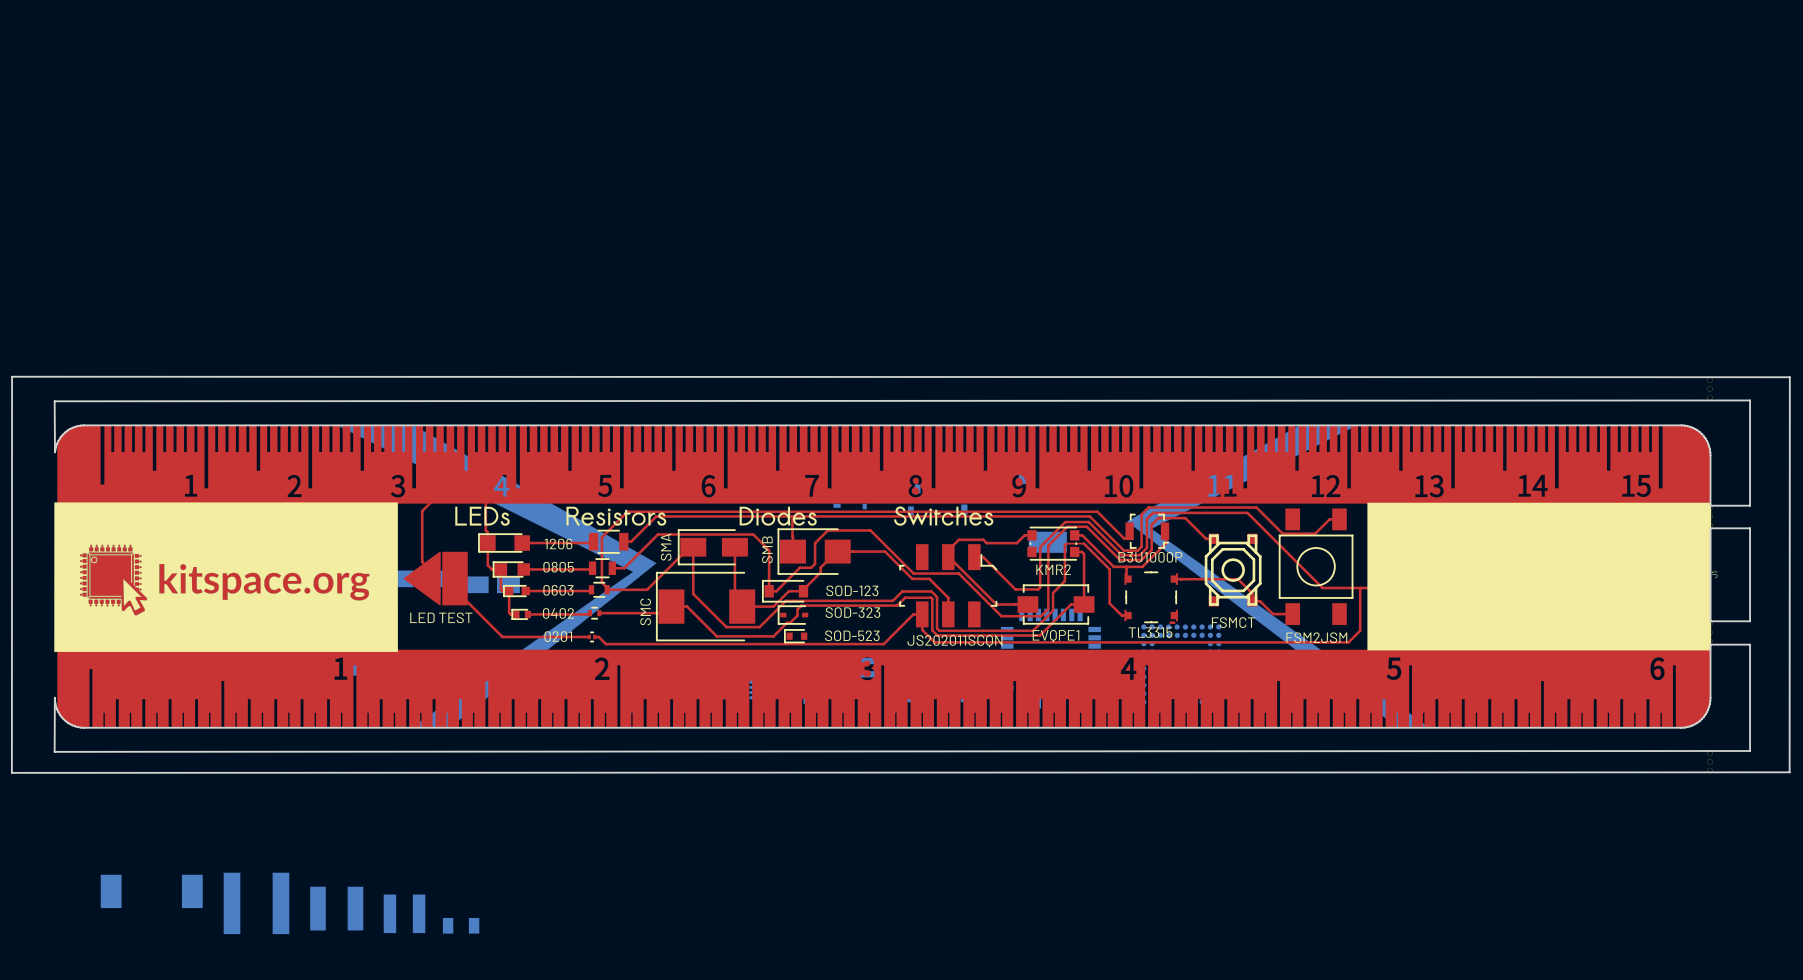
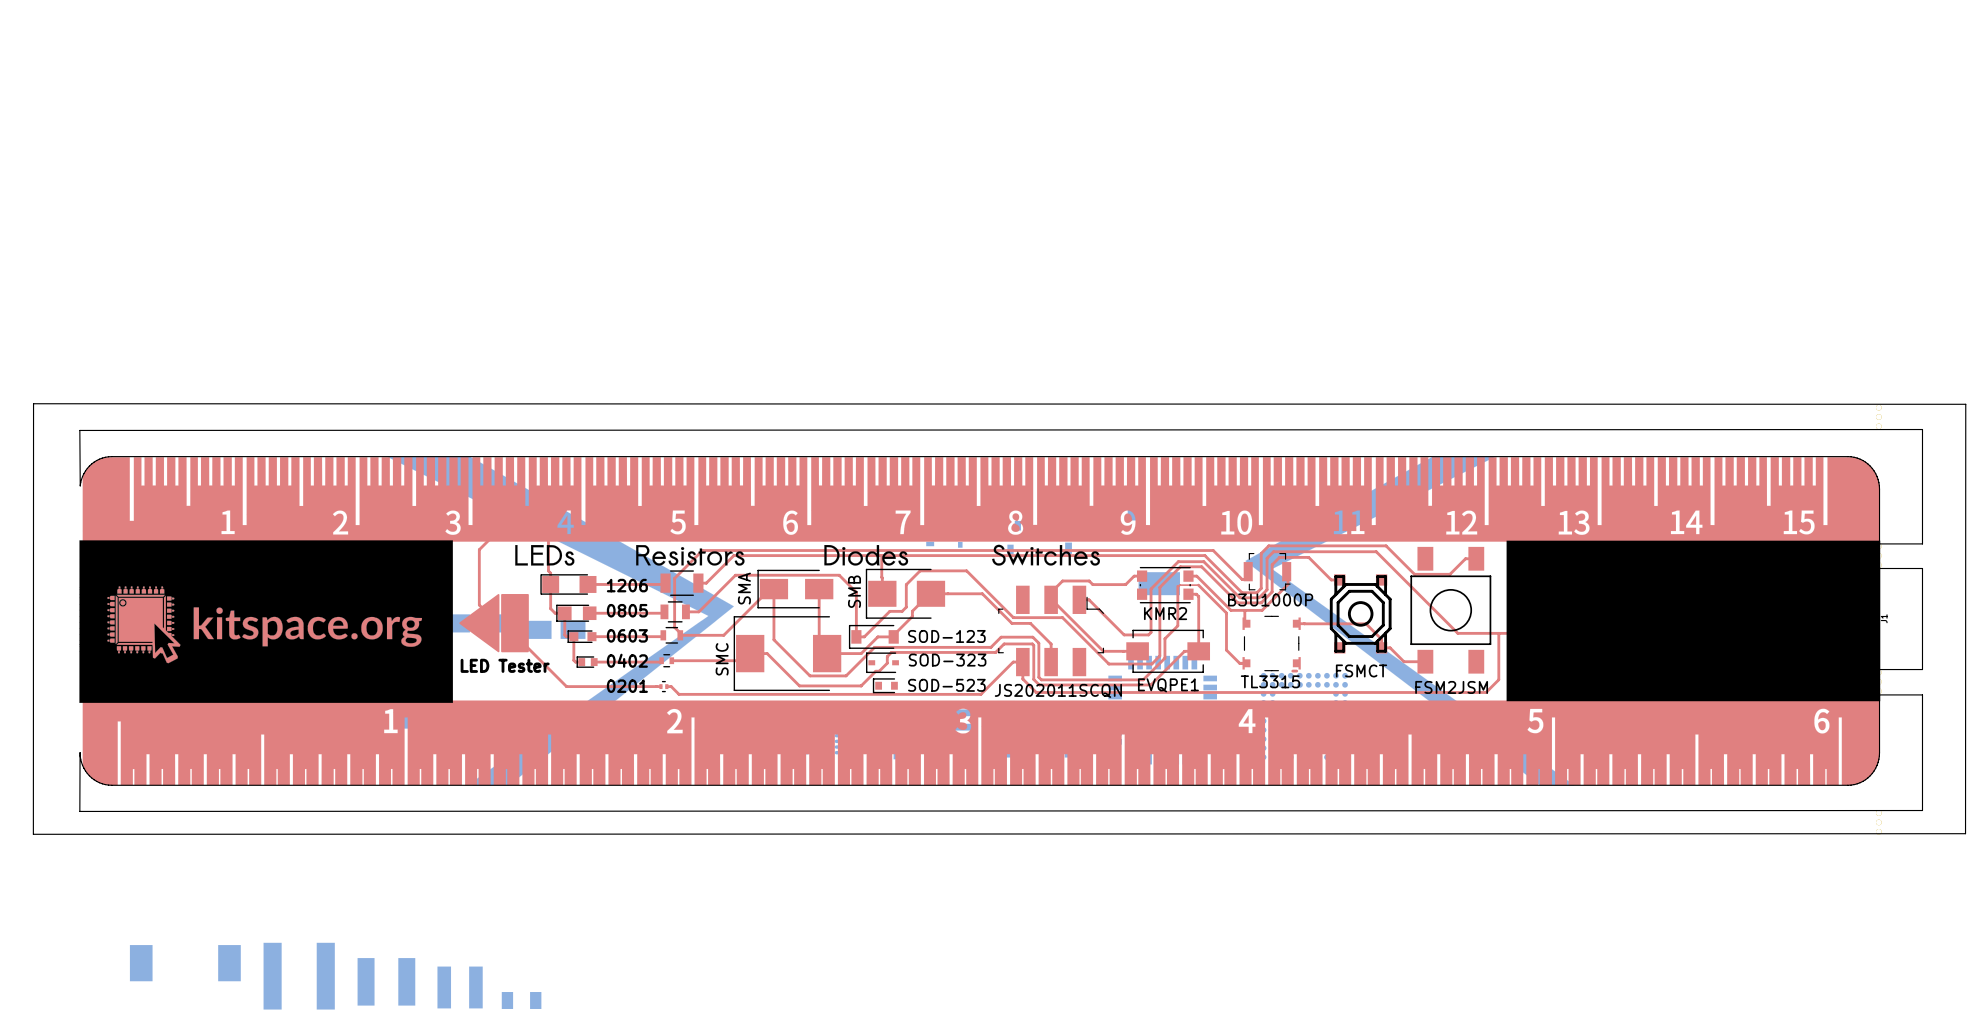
part text: LED TEST (441, 617) -> none
part text: none -> LED Tester (505, 665)

